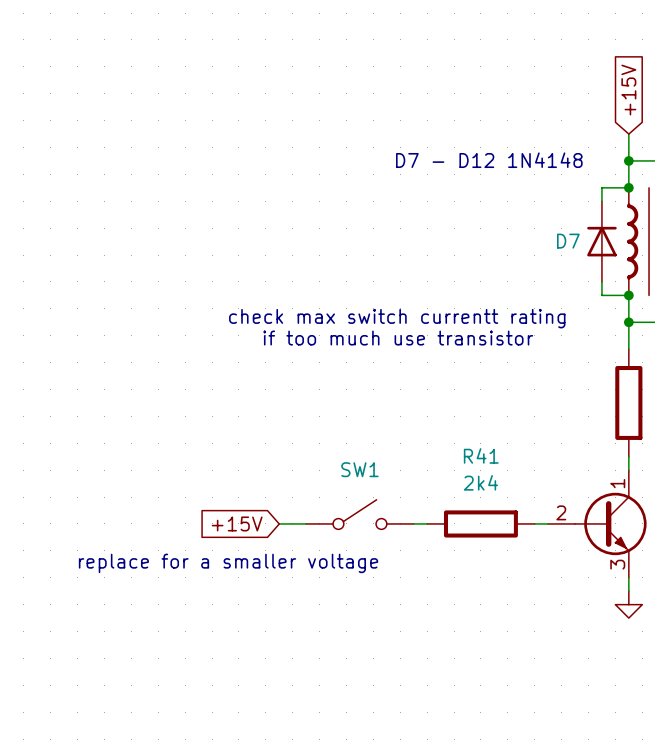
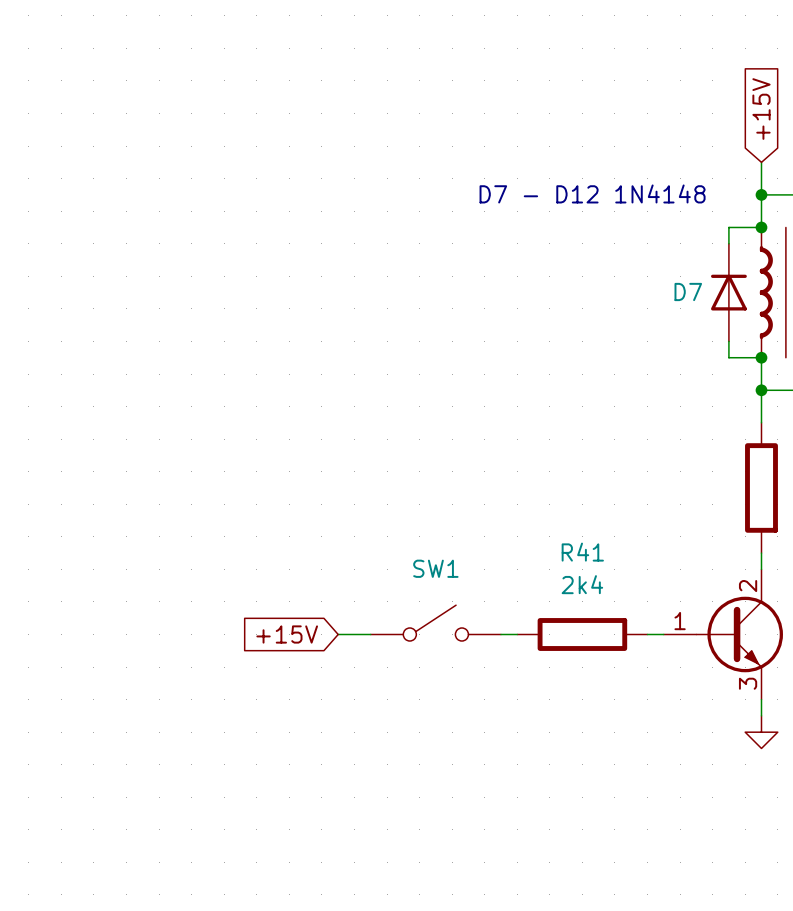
text: check max switch currentt rating (397, 318) -> none
text: if too much use transistor (398, 338) -> none
part pin number: 1 (617, 483) -> 2 (748, 586)
part pin number: 2 (561, 512) -> 1 (680, 621)
text: replace for a smaller voltage (228, 563) -> none

